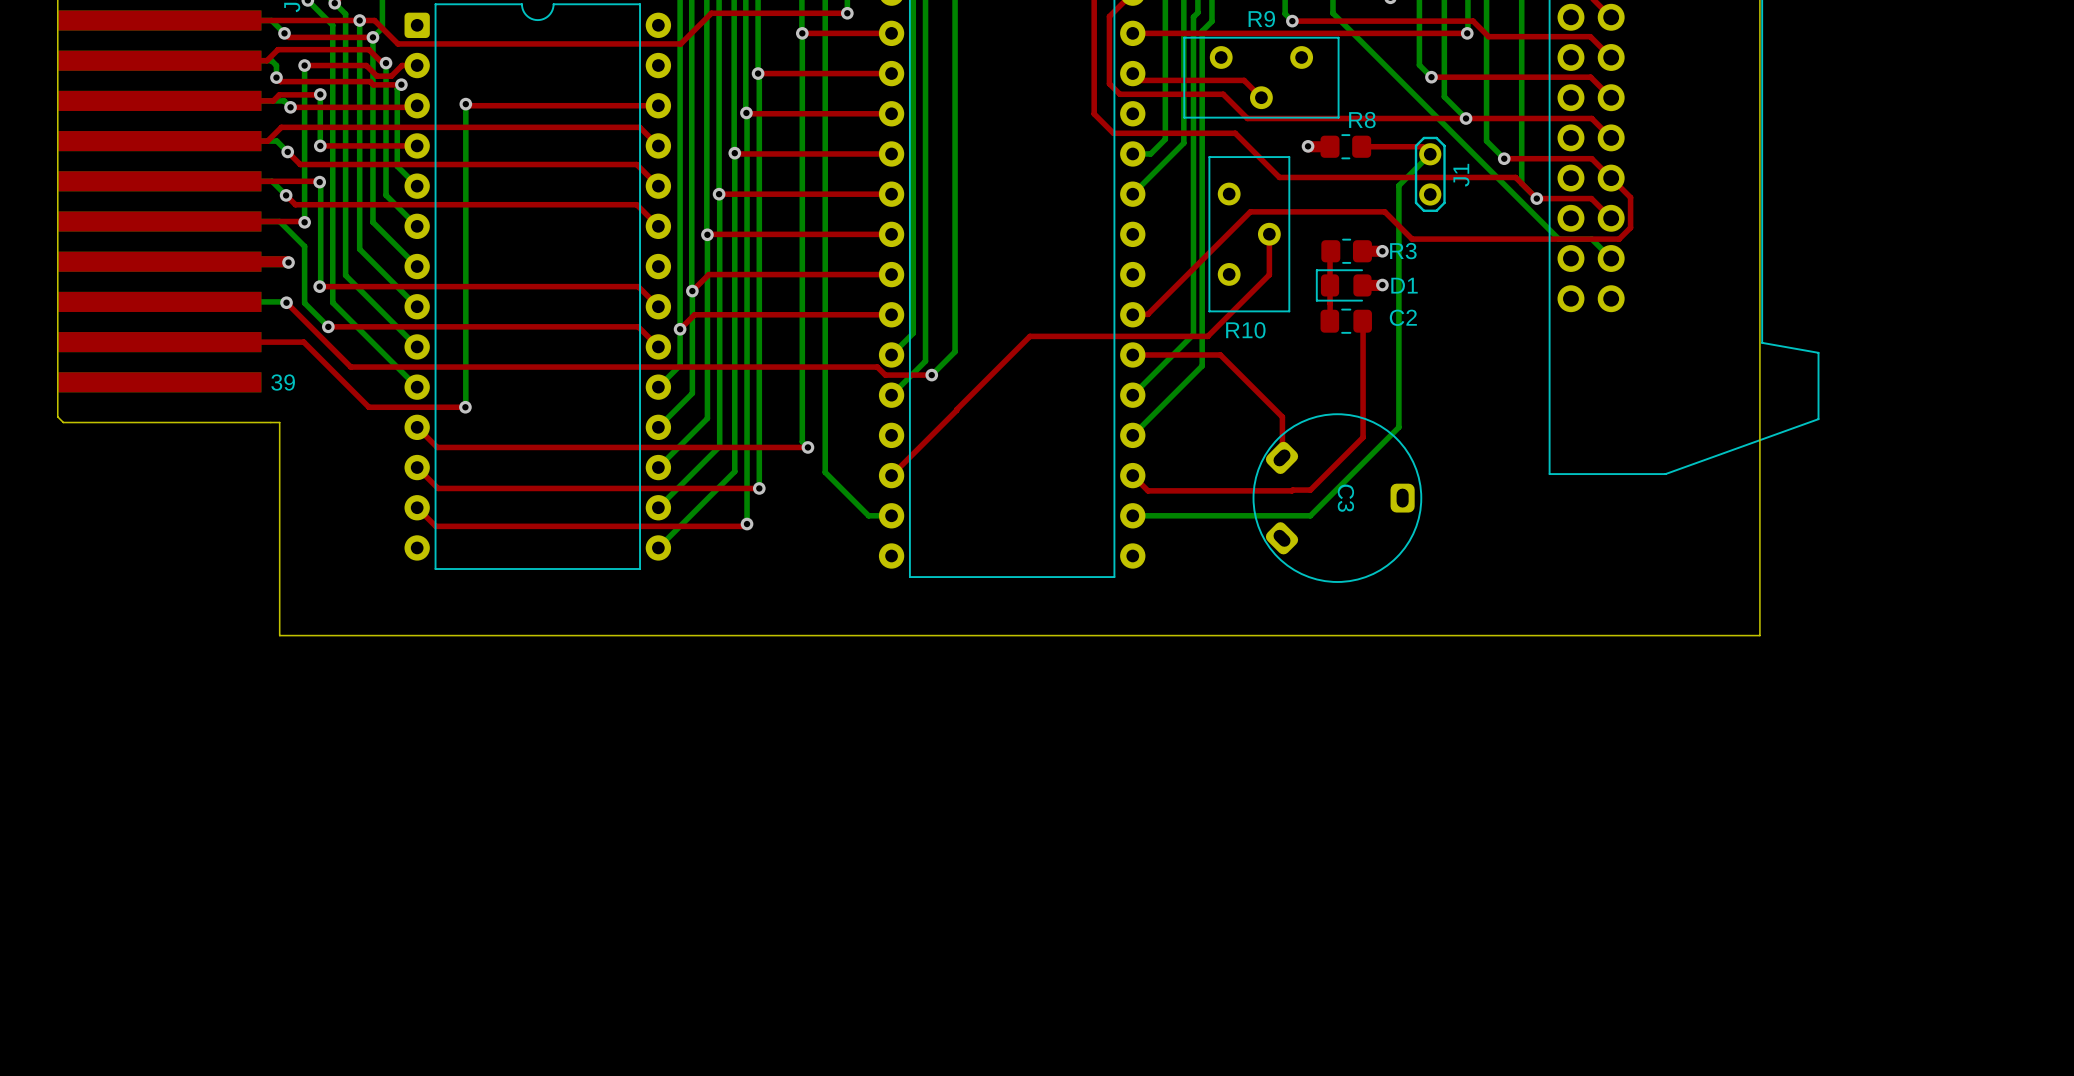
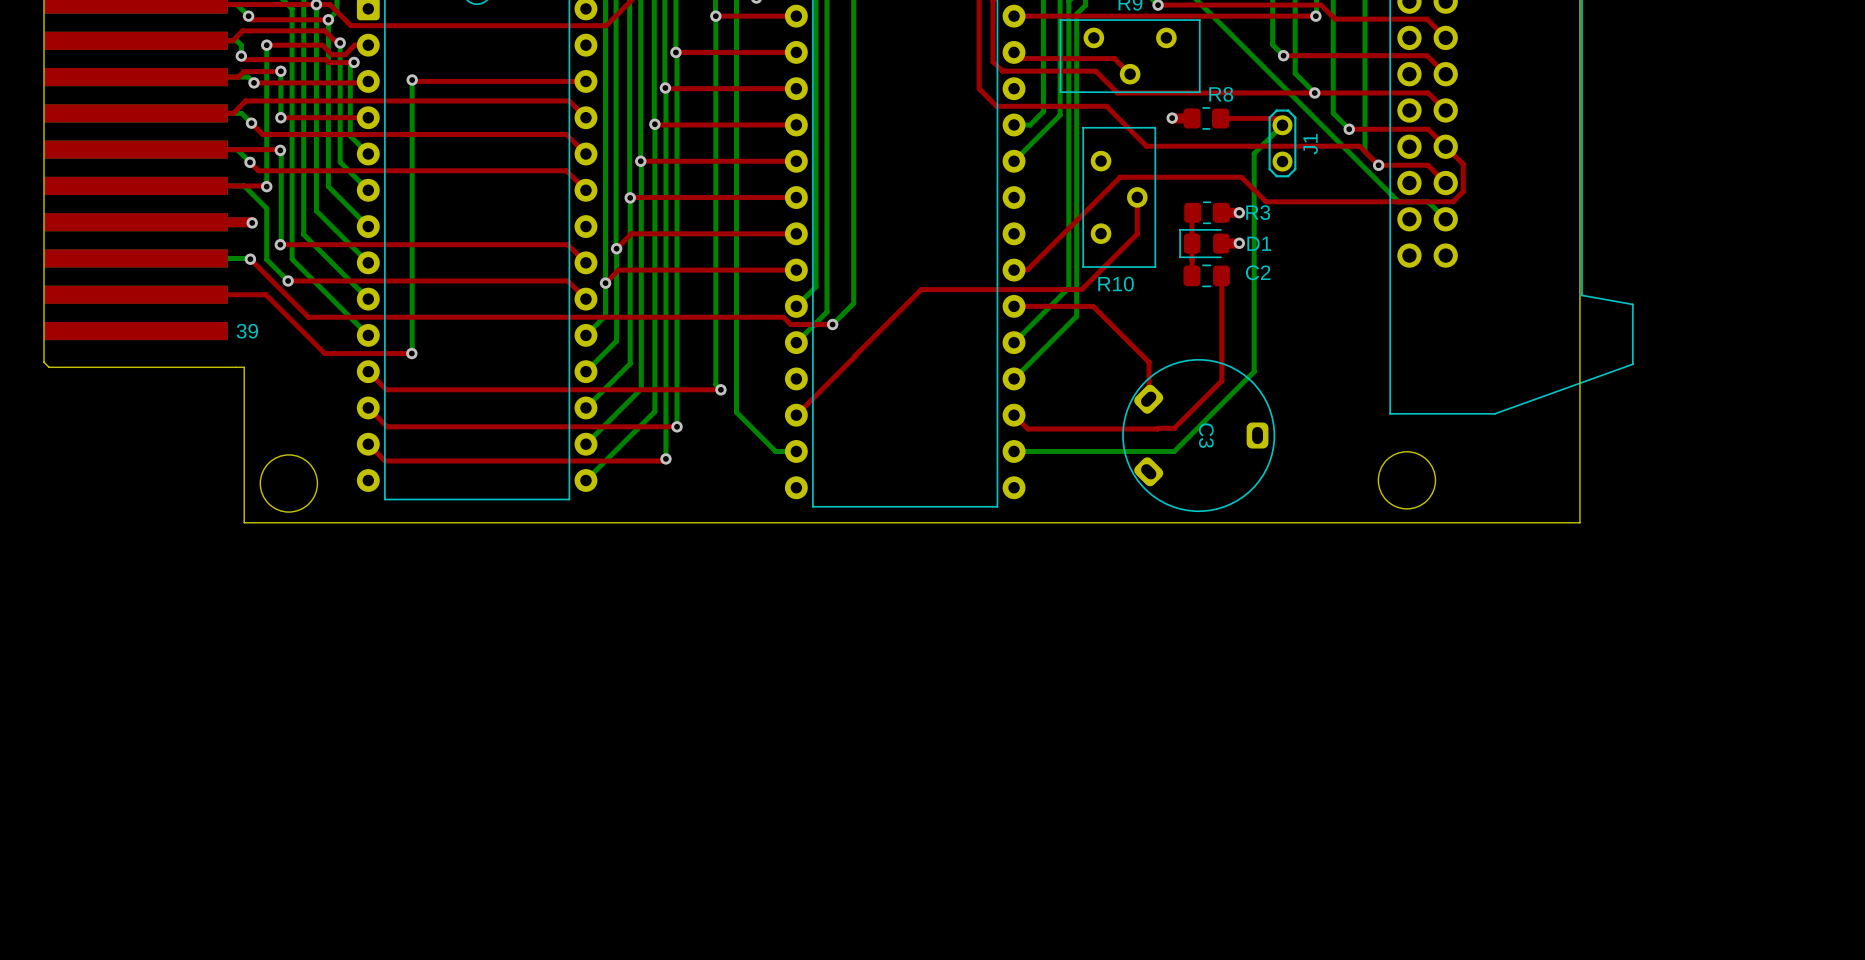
round board edge: none -> [1377, 451, 1437, 510]
round board edge: none -> [259, 454, 319, 513]
board edge: (279, 594) (279, 635) (1759, 635) (1759, 594) -> (244, 522) (1579, 522)

